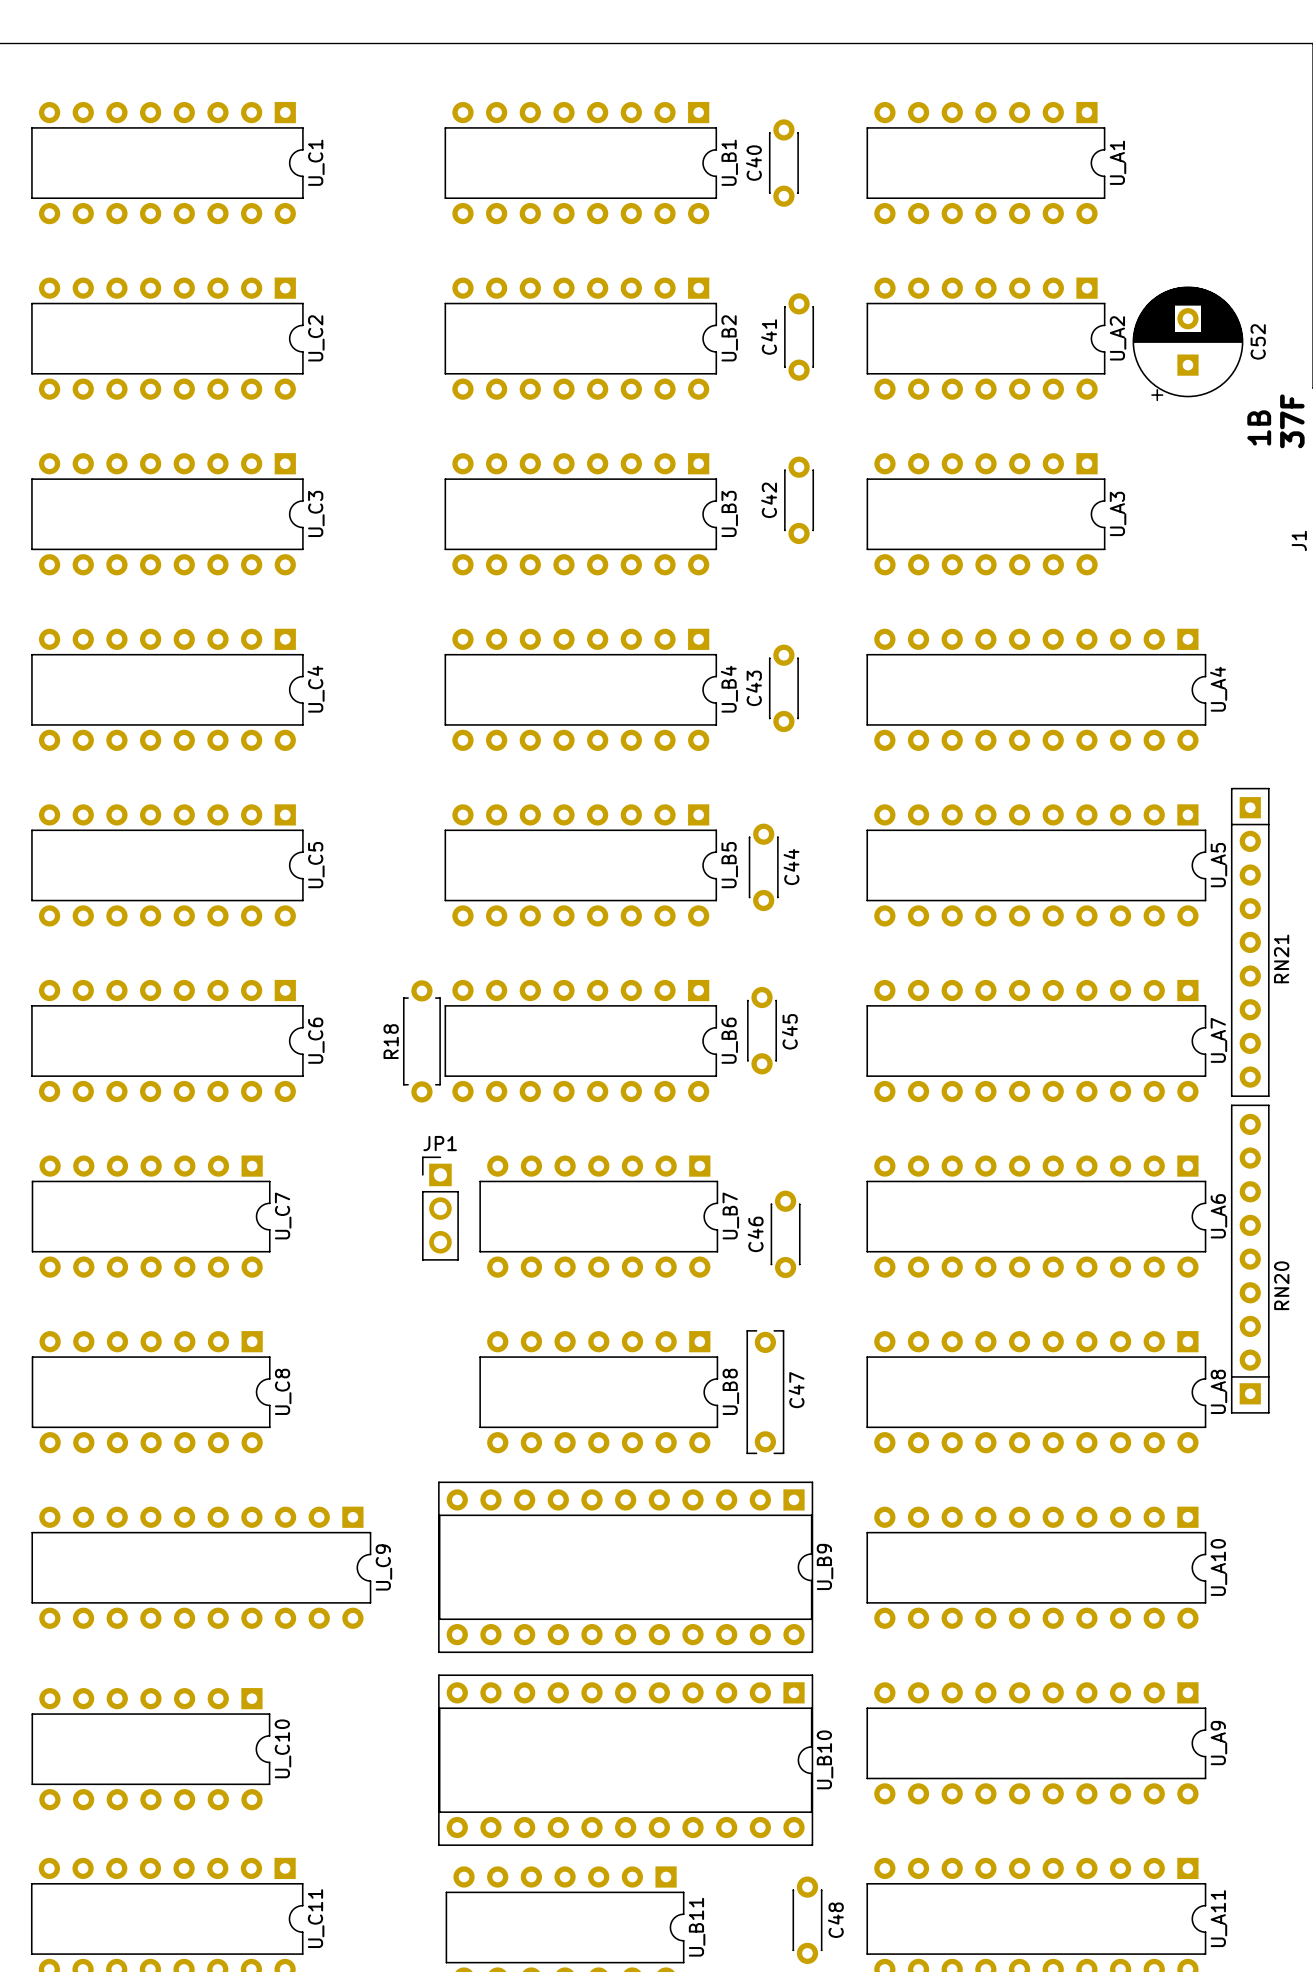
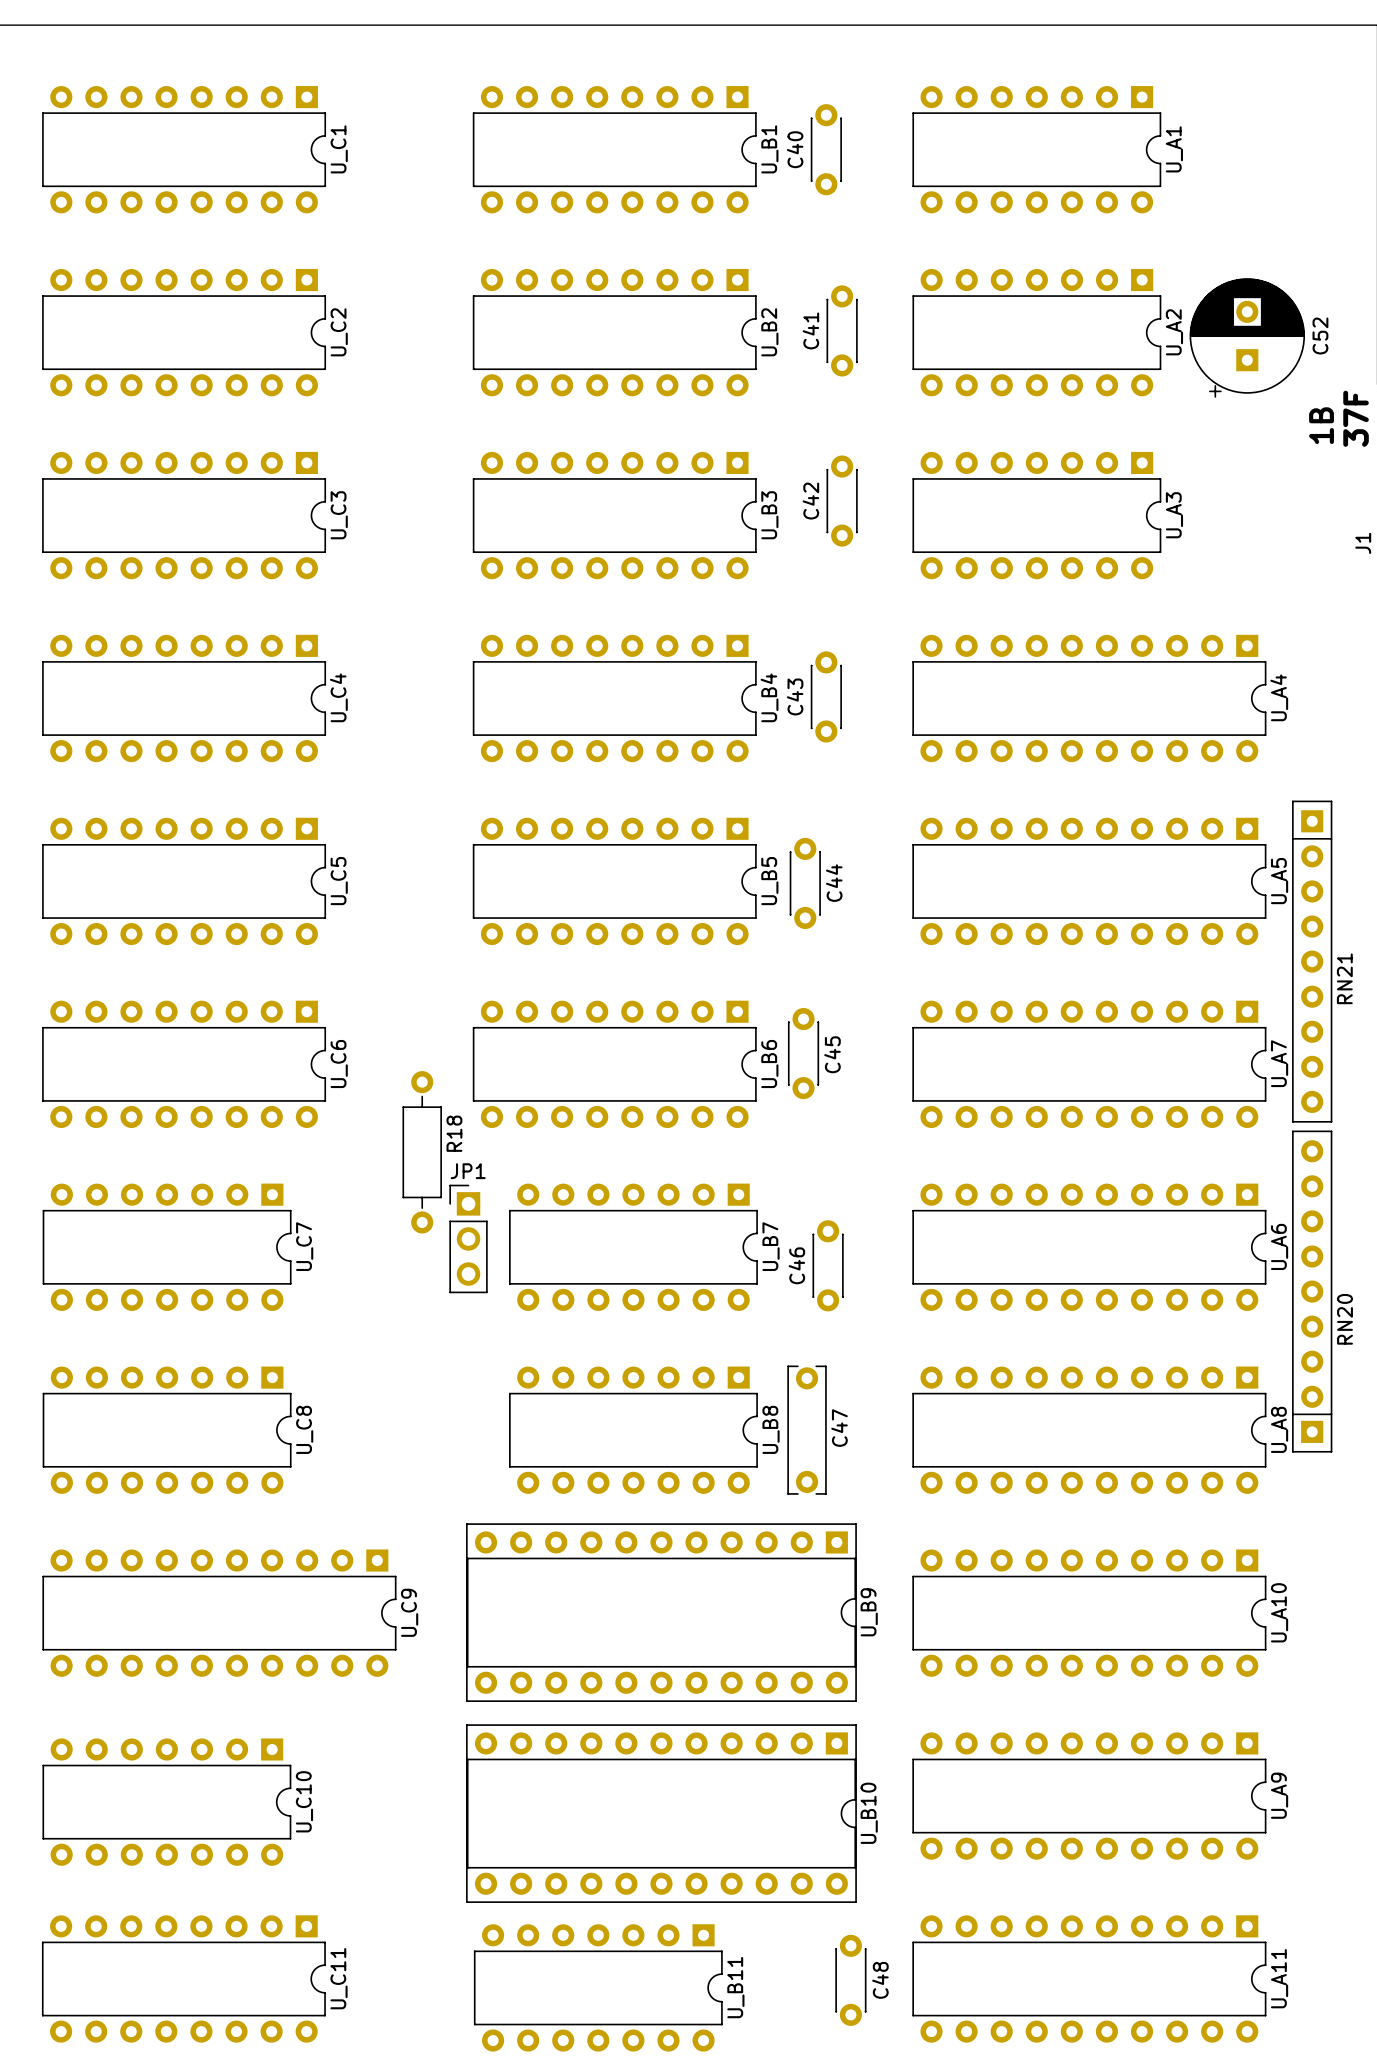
R18 footprint: [402, 980, 441, 1103] -> [402, 1071, 442, 1234]
R18 name position: R18 (391, 1041) -> R18 (454, 1133)

